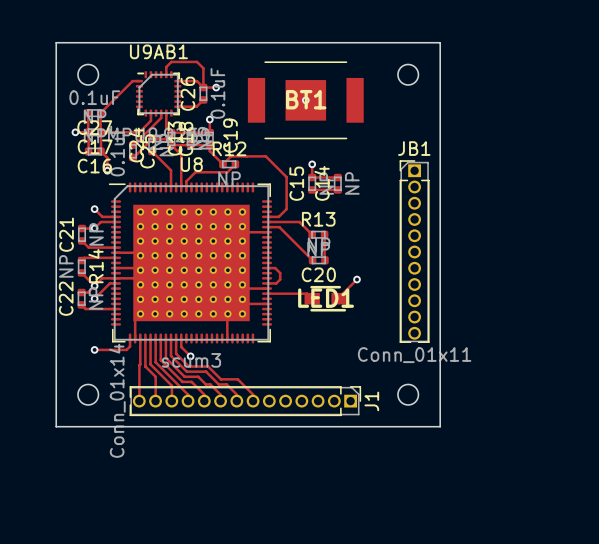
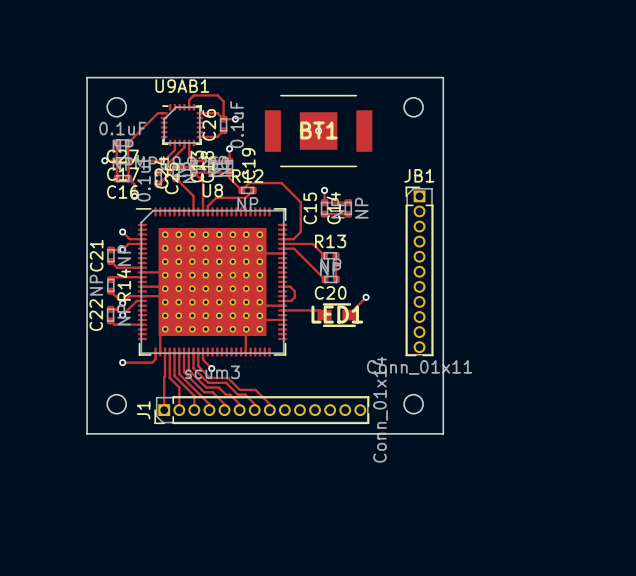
J1 rotation: 0° (245, 401) -> 180° (261, 410)

